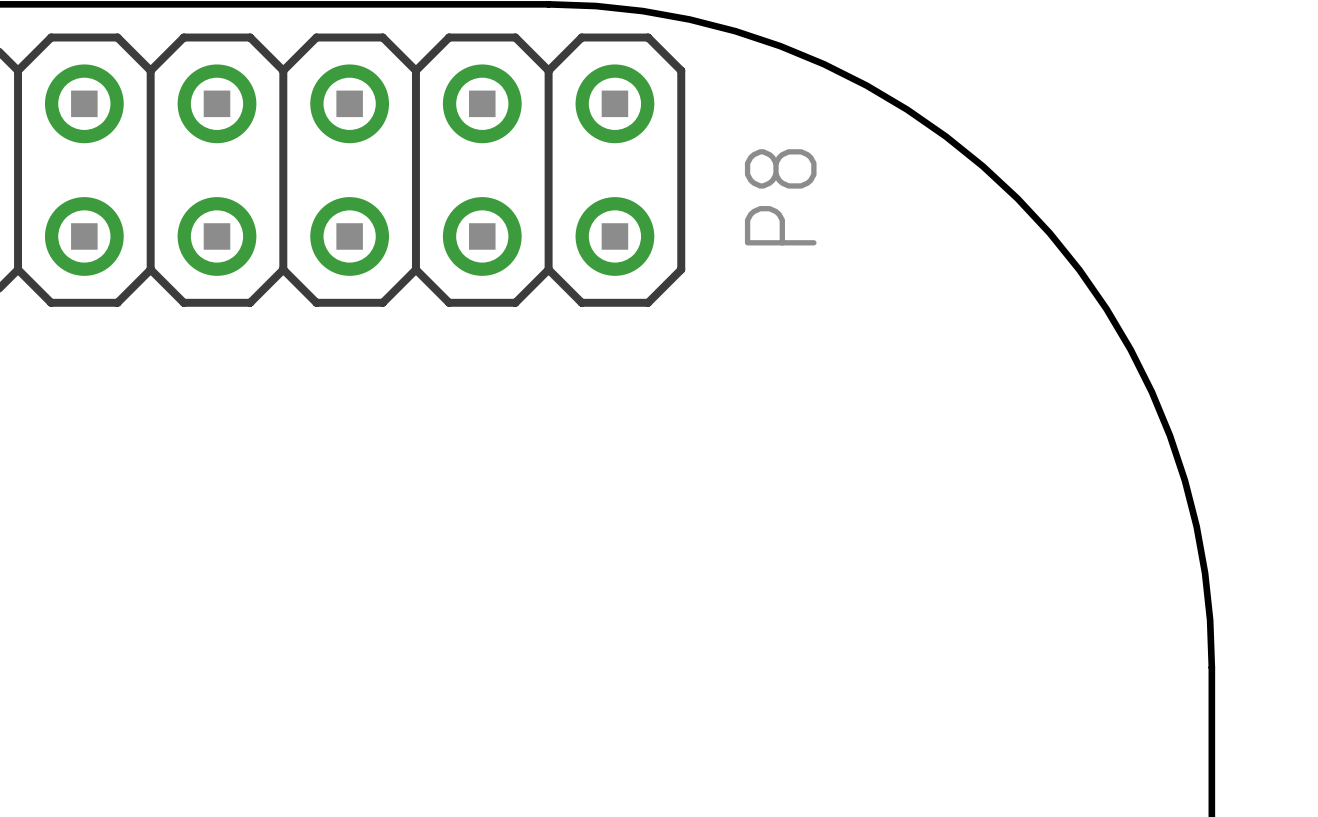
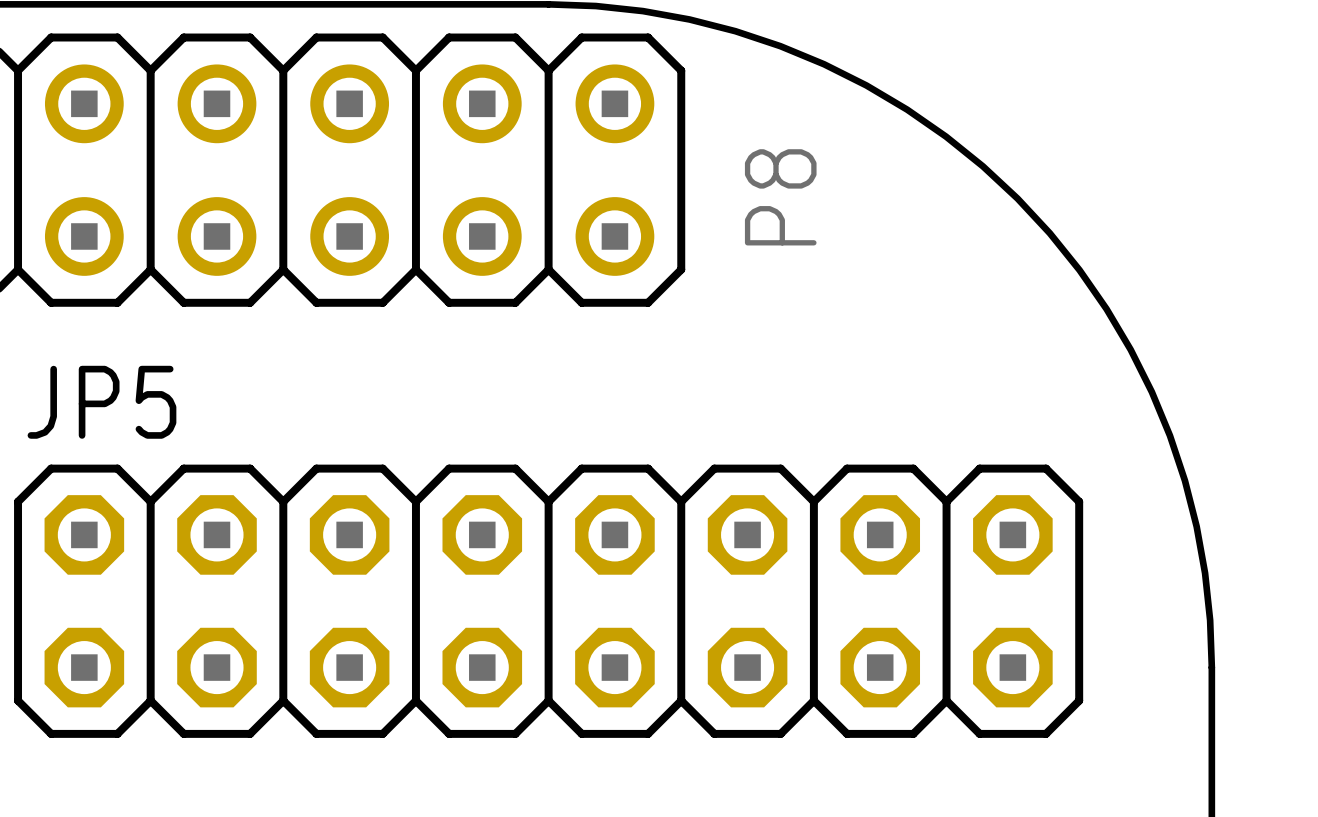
JP5: none -> (548, 601)

